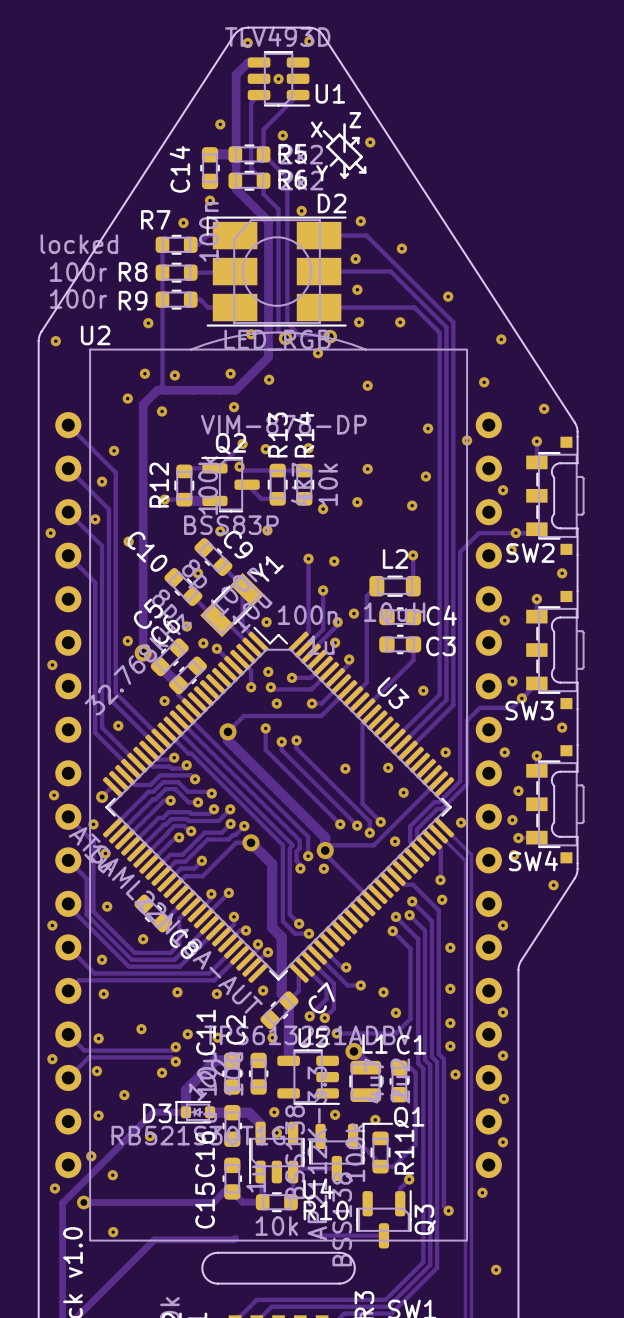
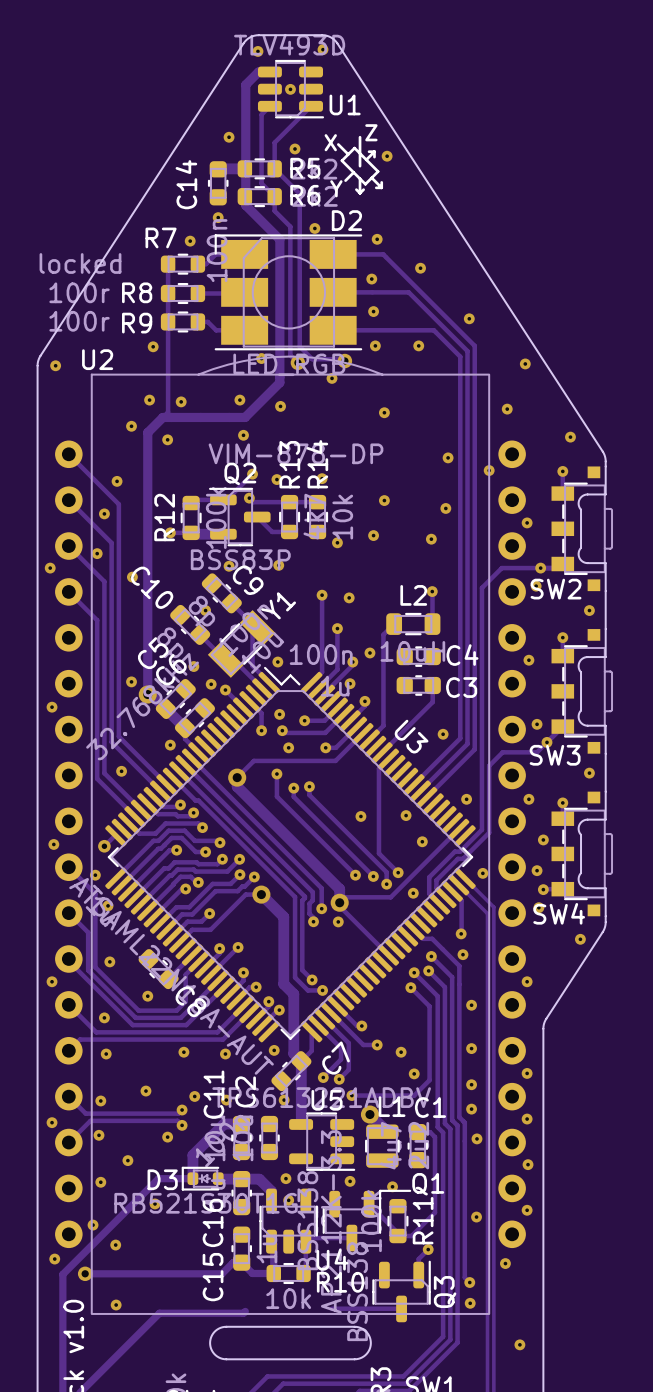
via: none -> (476, 1217)
via: none -> (470, 1303)

